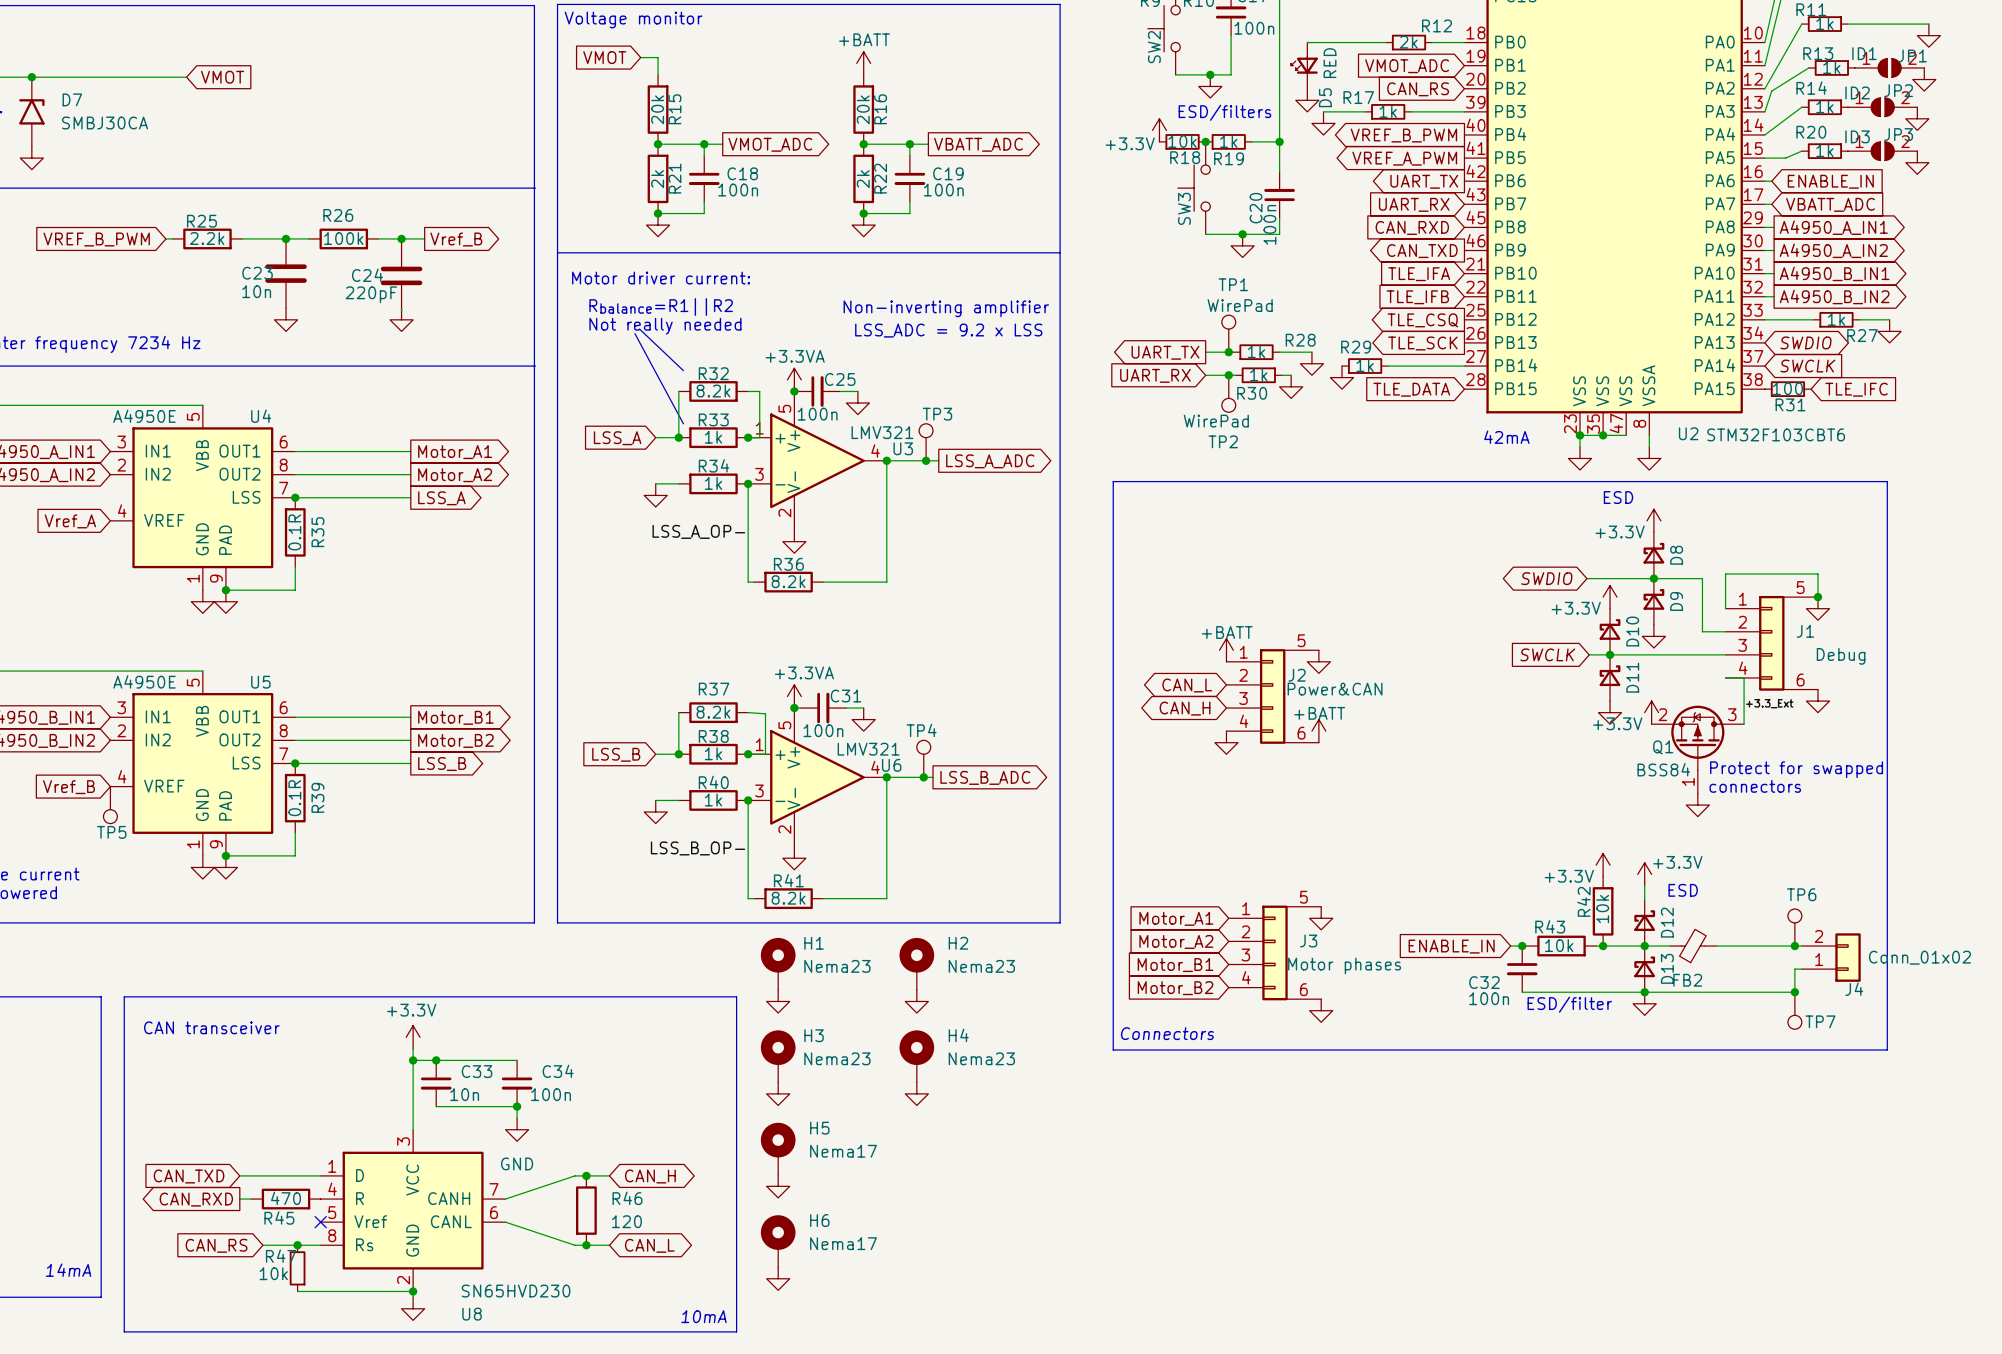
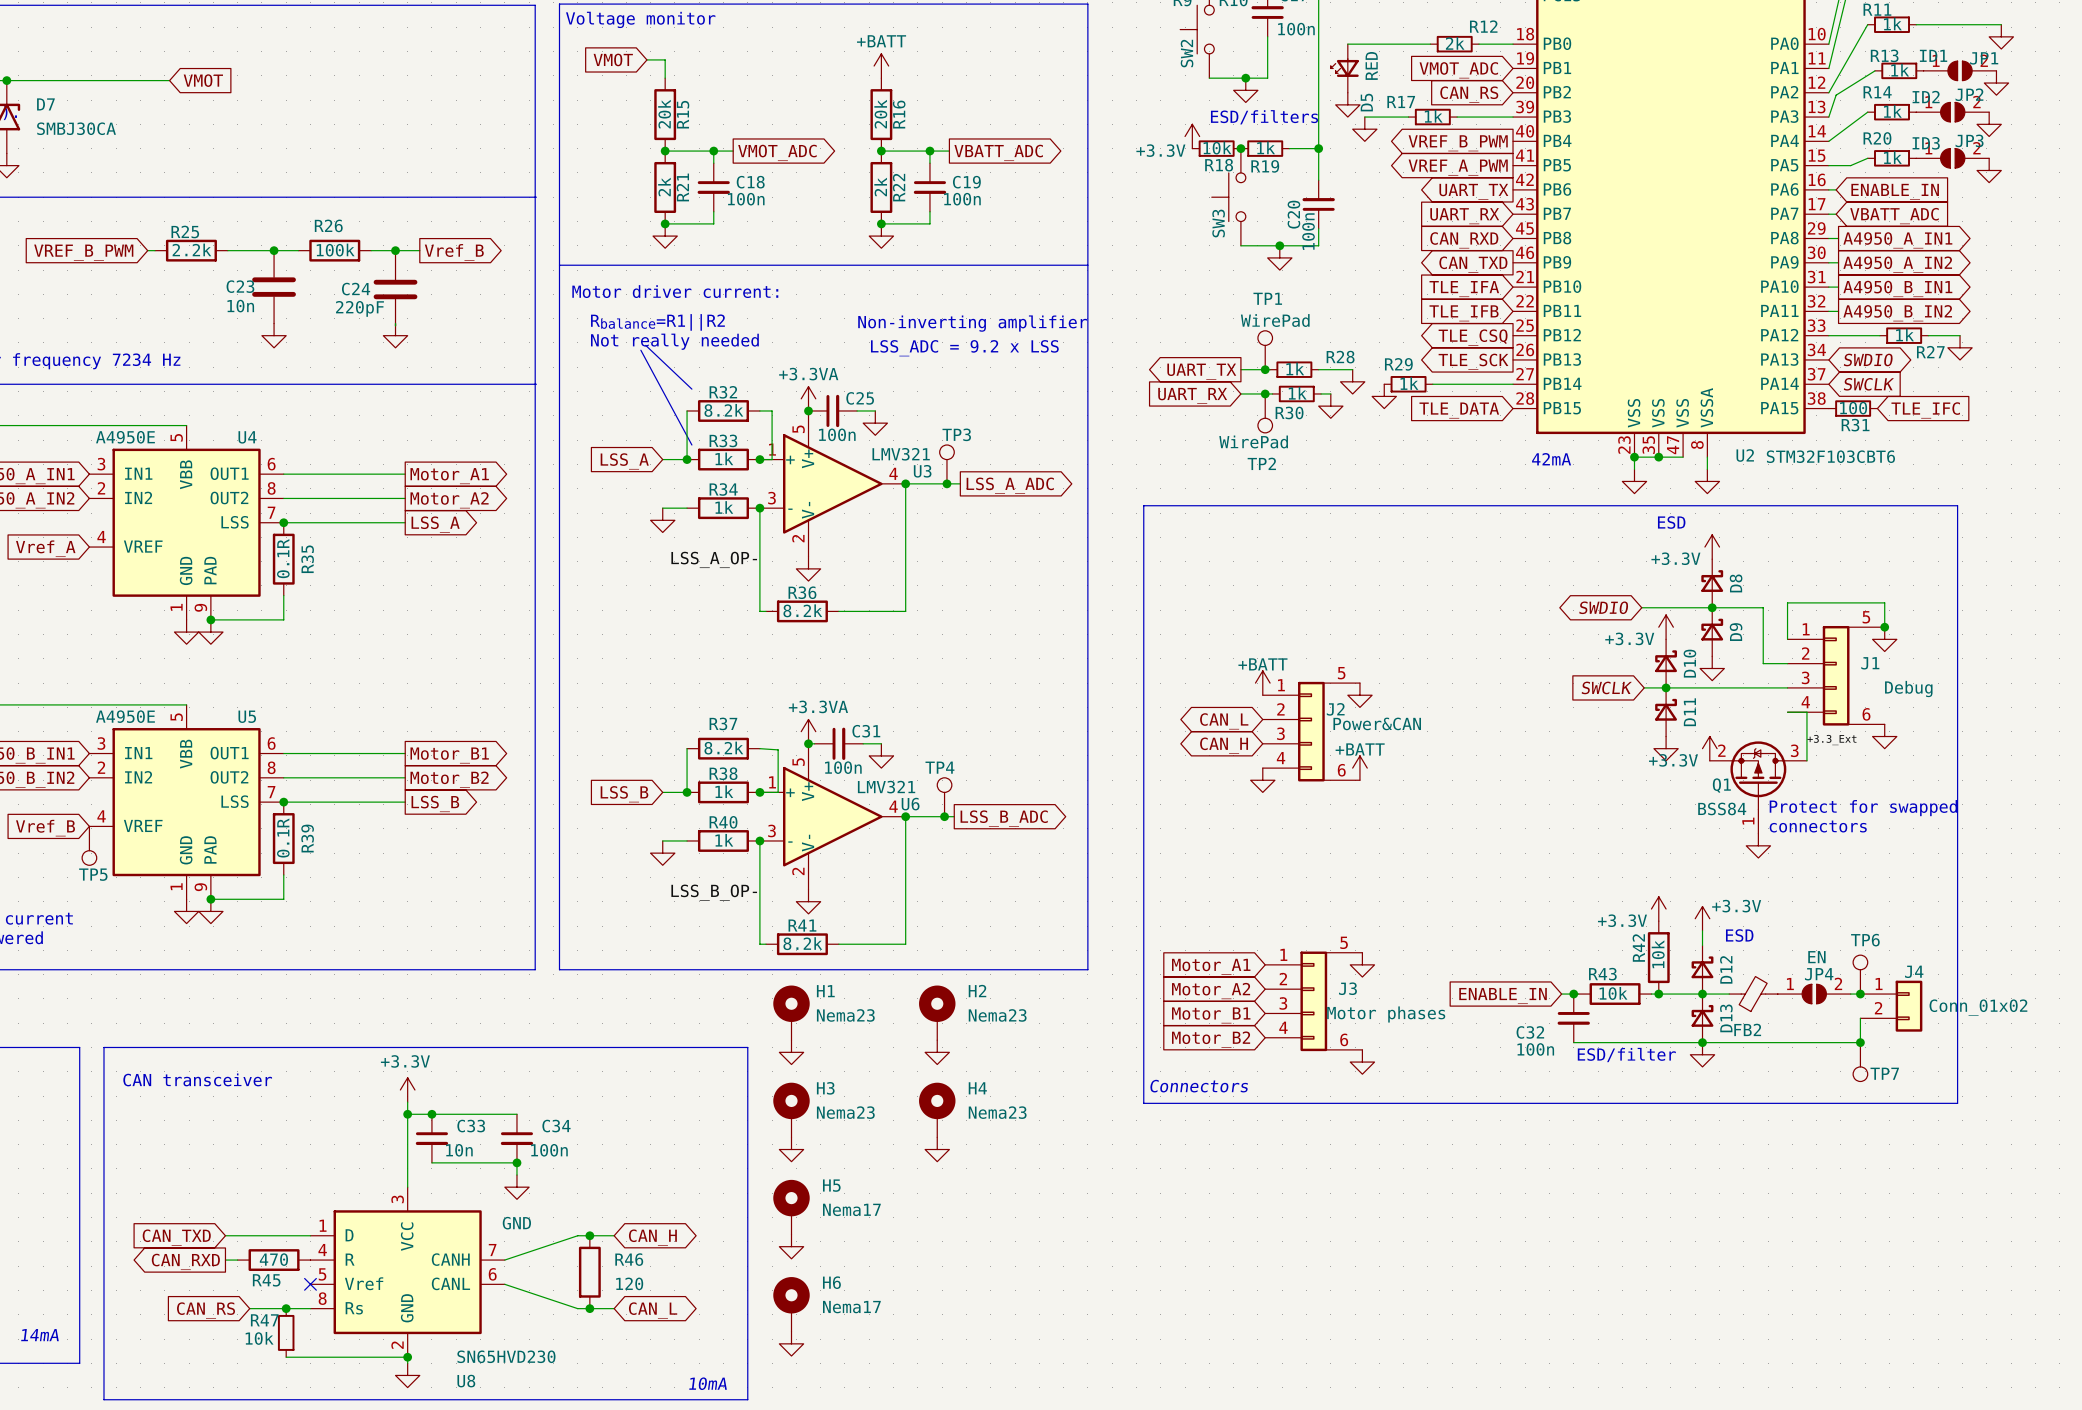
JP4: none -> EN (1814, 994)
J4 flip: as is (1848, 957) -> up-down (1909, 1006)

